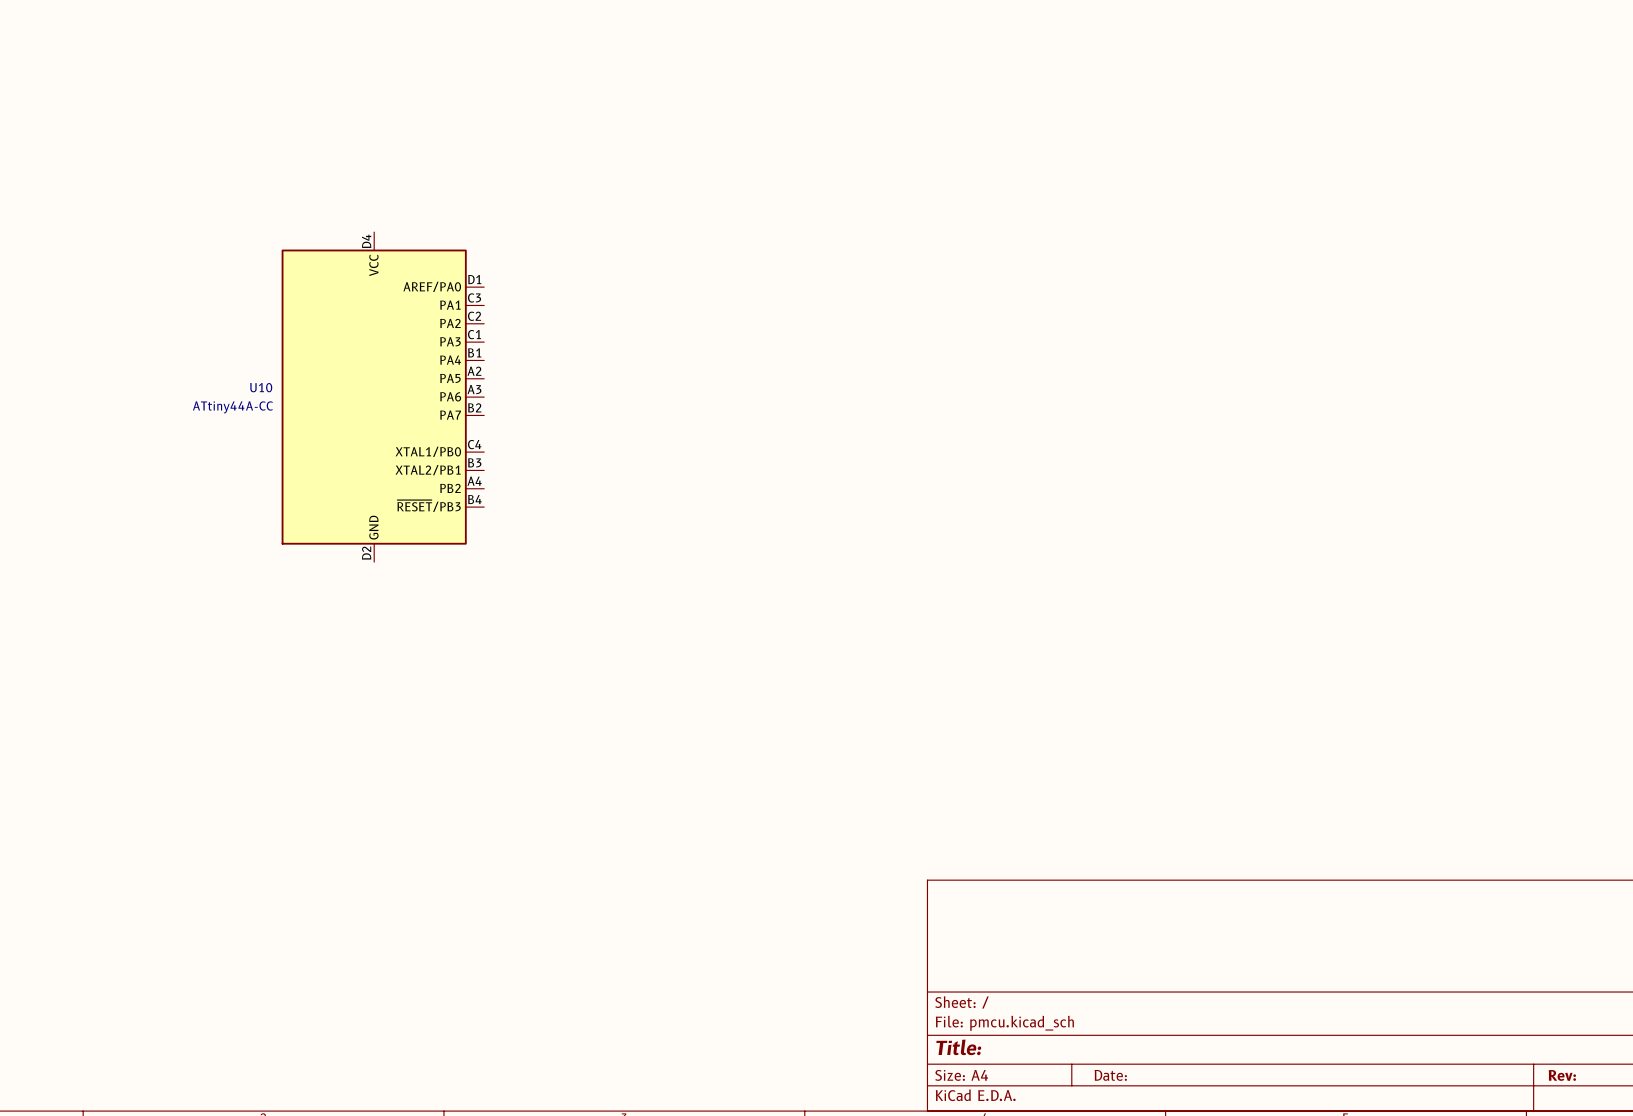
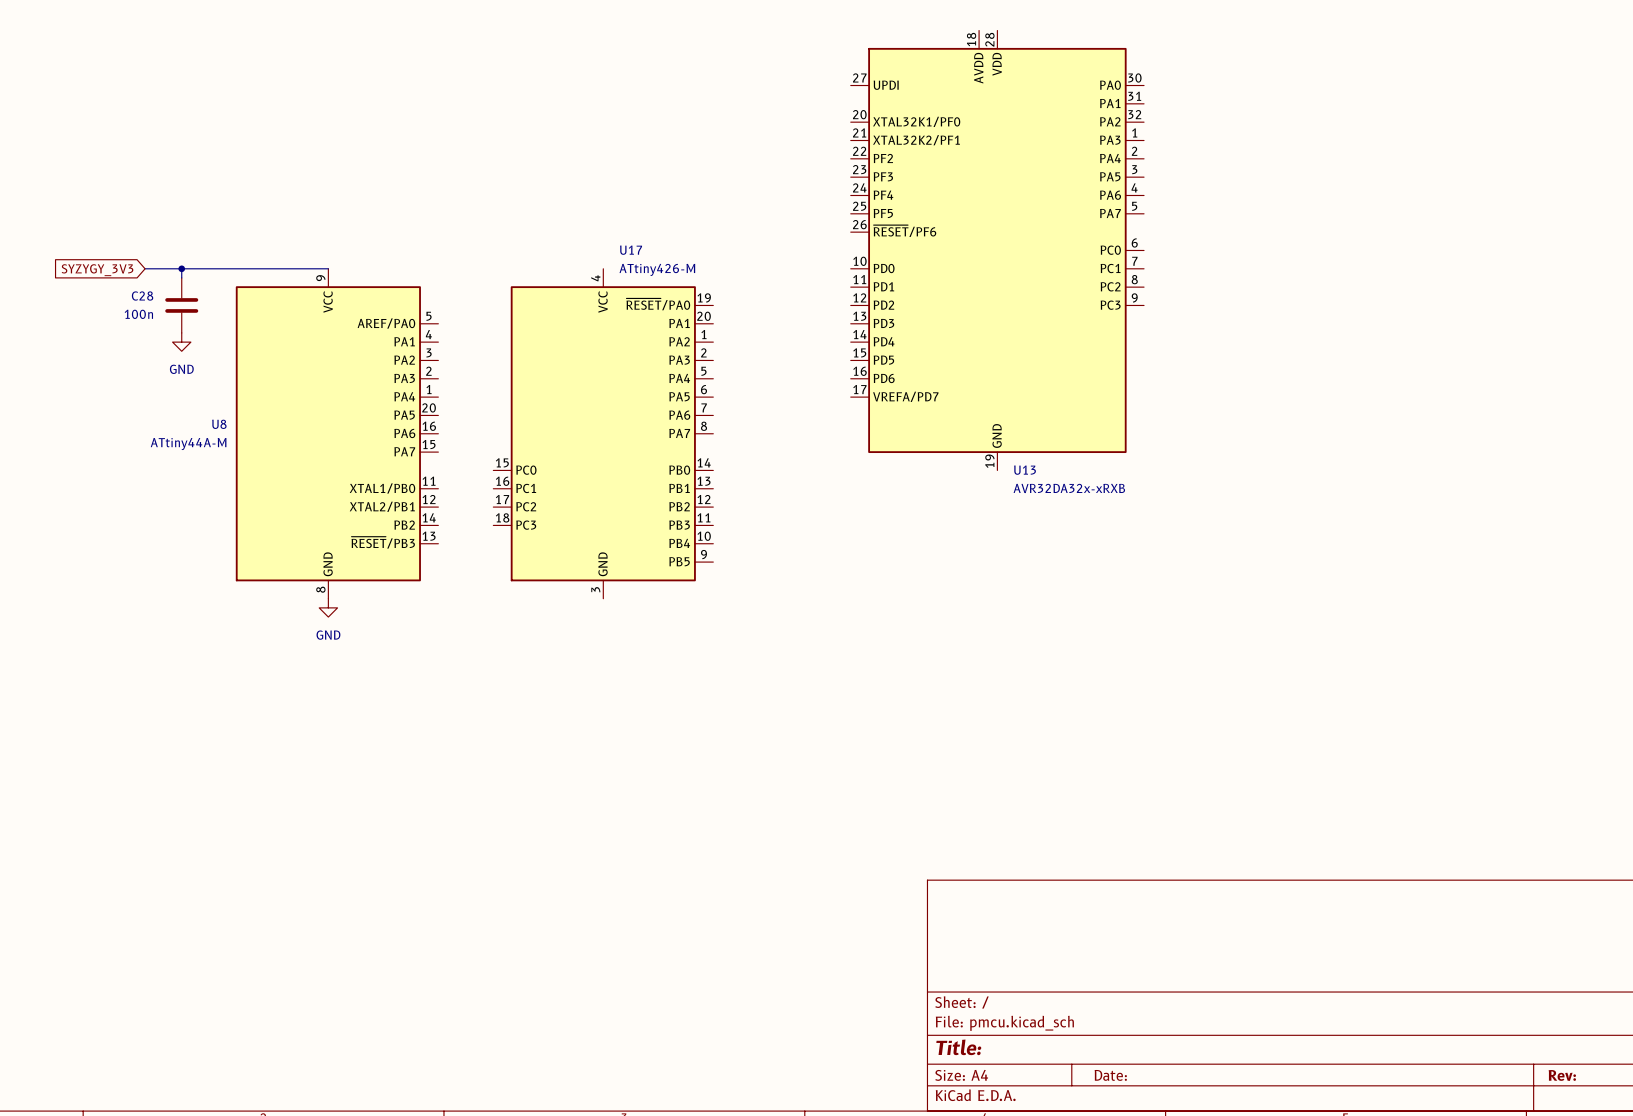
U13: none -> AVR32DA32x-xRXB (997, 250)
wire: none -> (145, 268) (328, 268)
wire: none -> (181, 268) (181, 277)
junction: none -> (181, 268)
global label: none -> SYZYGY_3V3 (97, 270)
C28: none -> 100n (181, 305)
power symbol: none -> GND (181, 342)
U10: ATtiny44A-CC (382, 397) -> none
U8: none -> ATtiny44A-M (337, 433)
U17: none -> ATtiny426-M (603, 433)
power symbol: none -> GND (328, 607)

